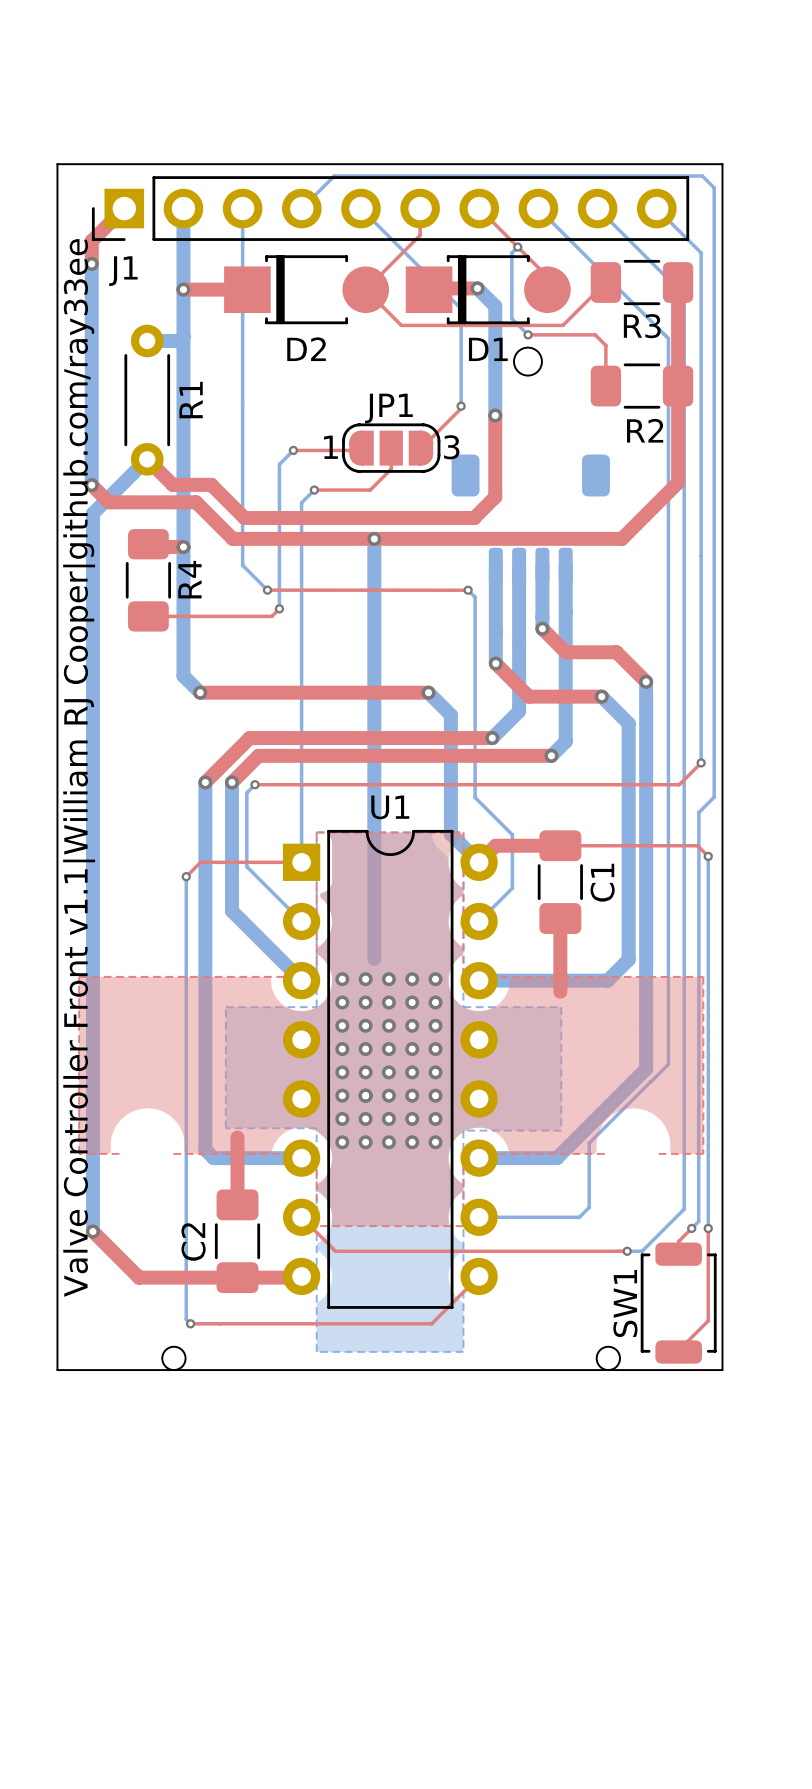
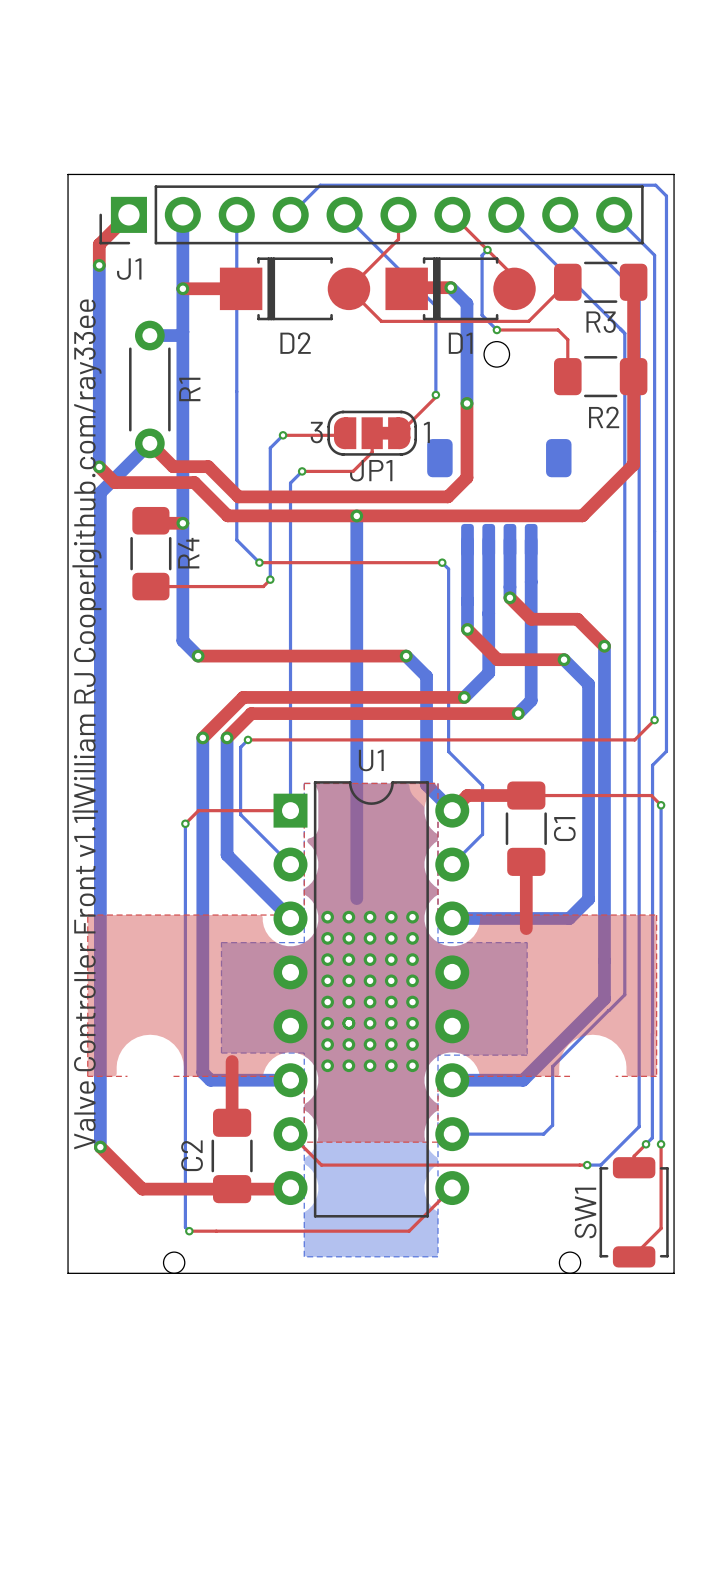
JP1 name position: JP1 (388, 408) -> JP1 (371, 470)
JP1 footprint: [342, 423, 441, 473] -> [327, 410, 417, 456]

